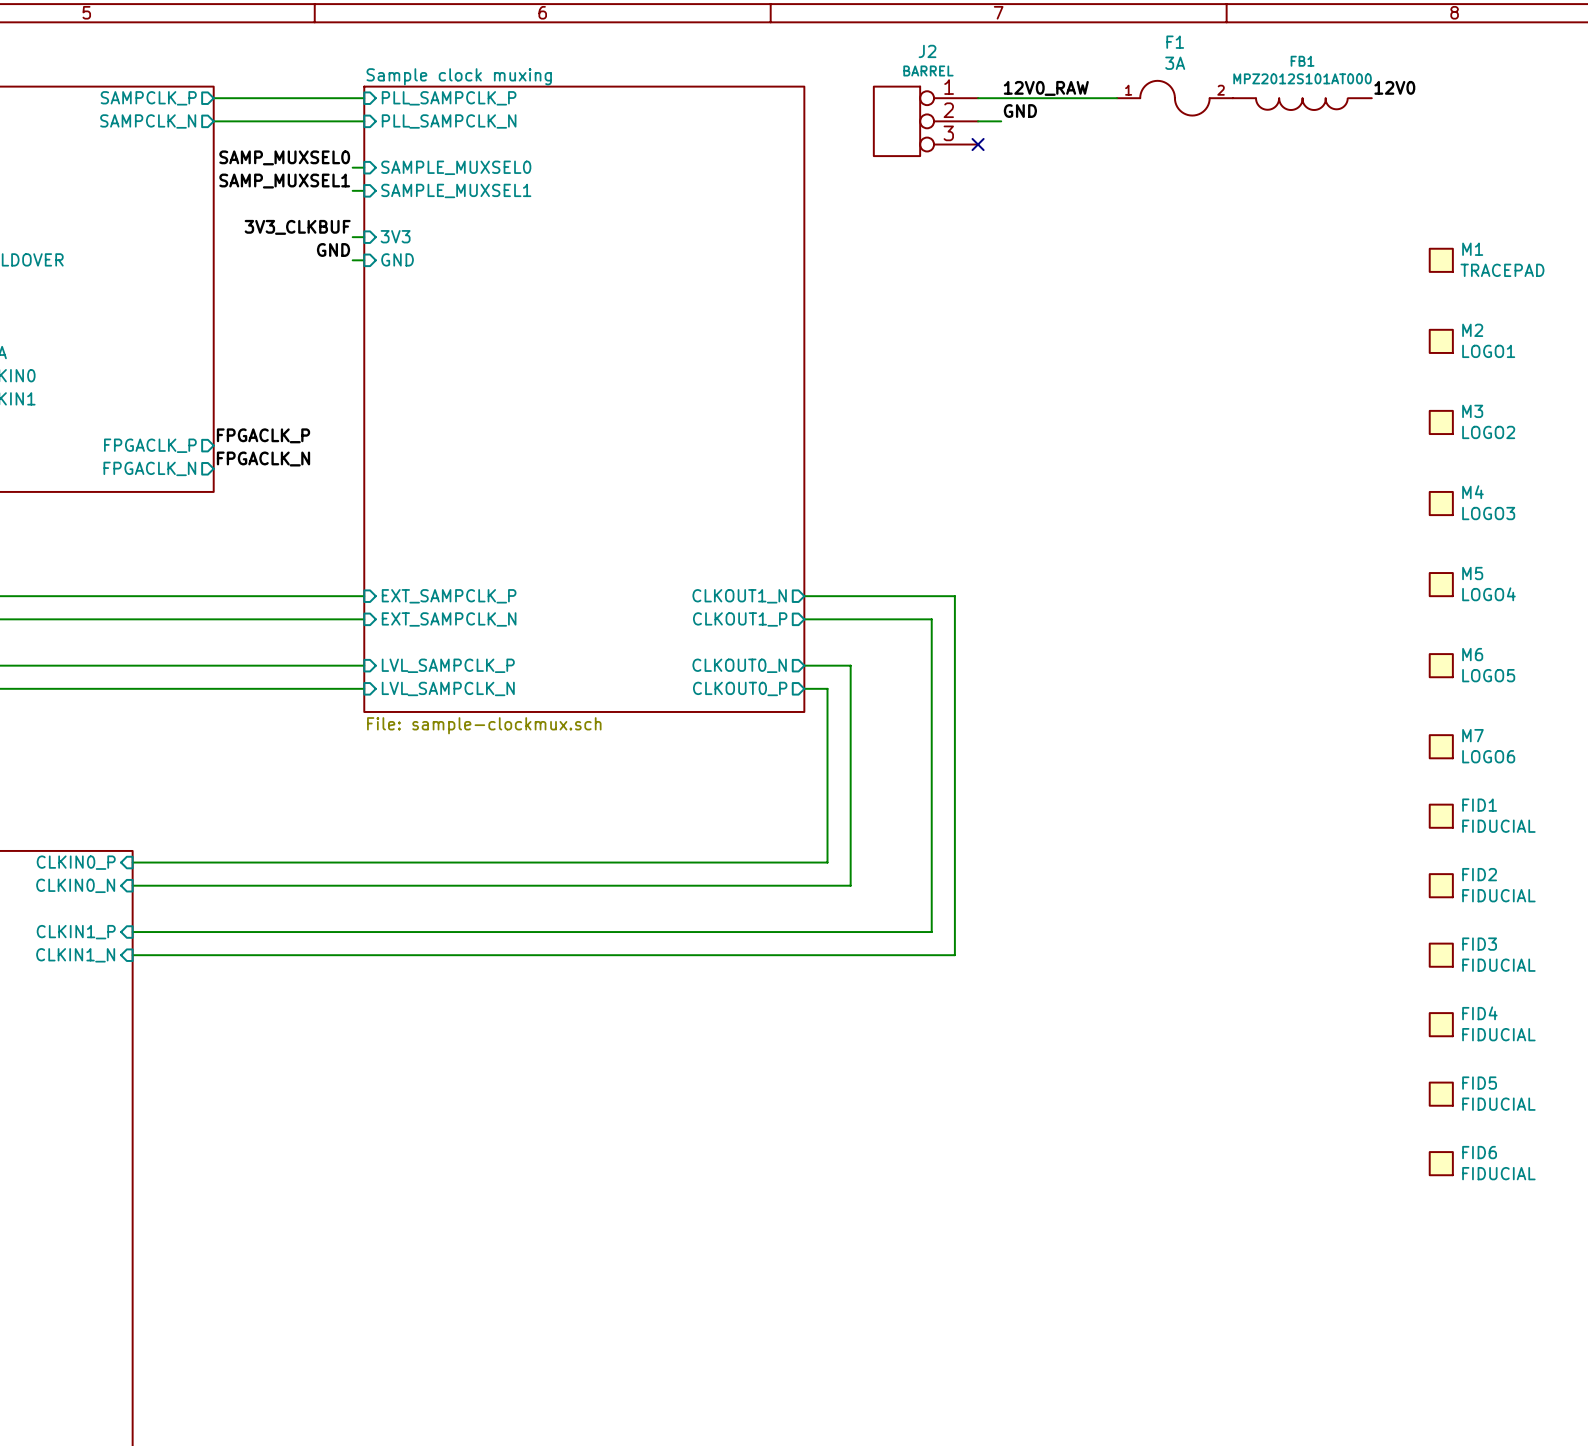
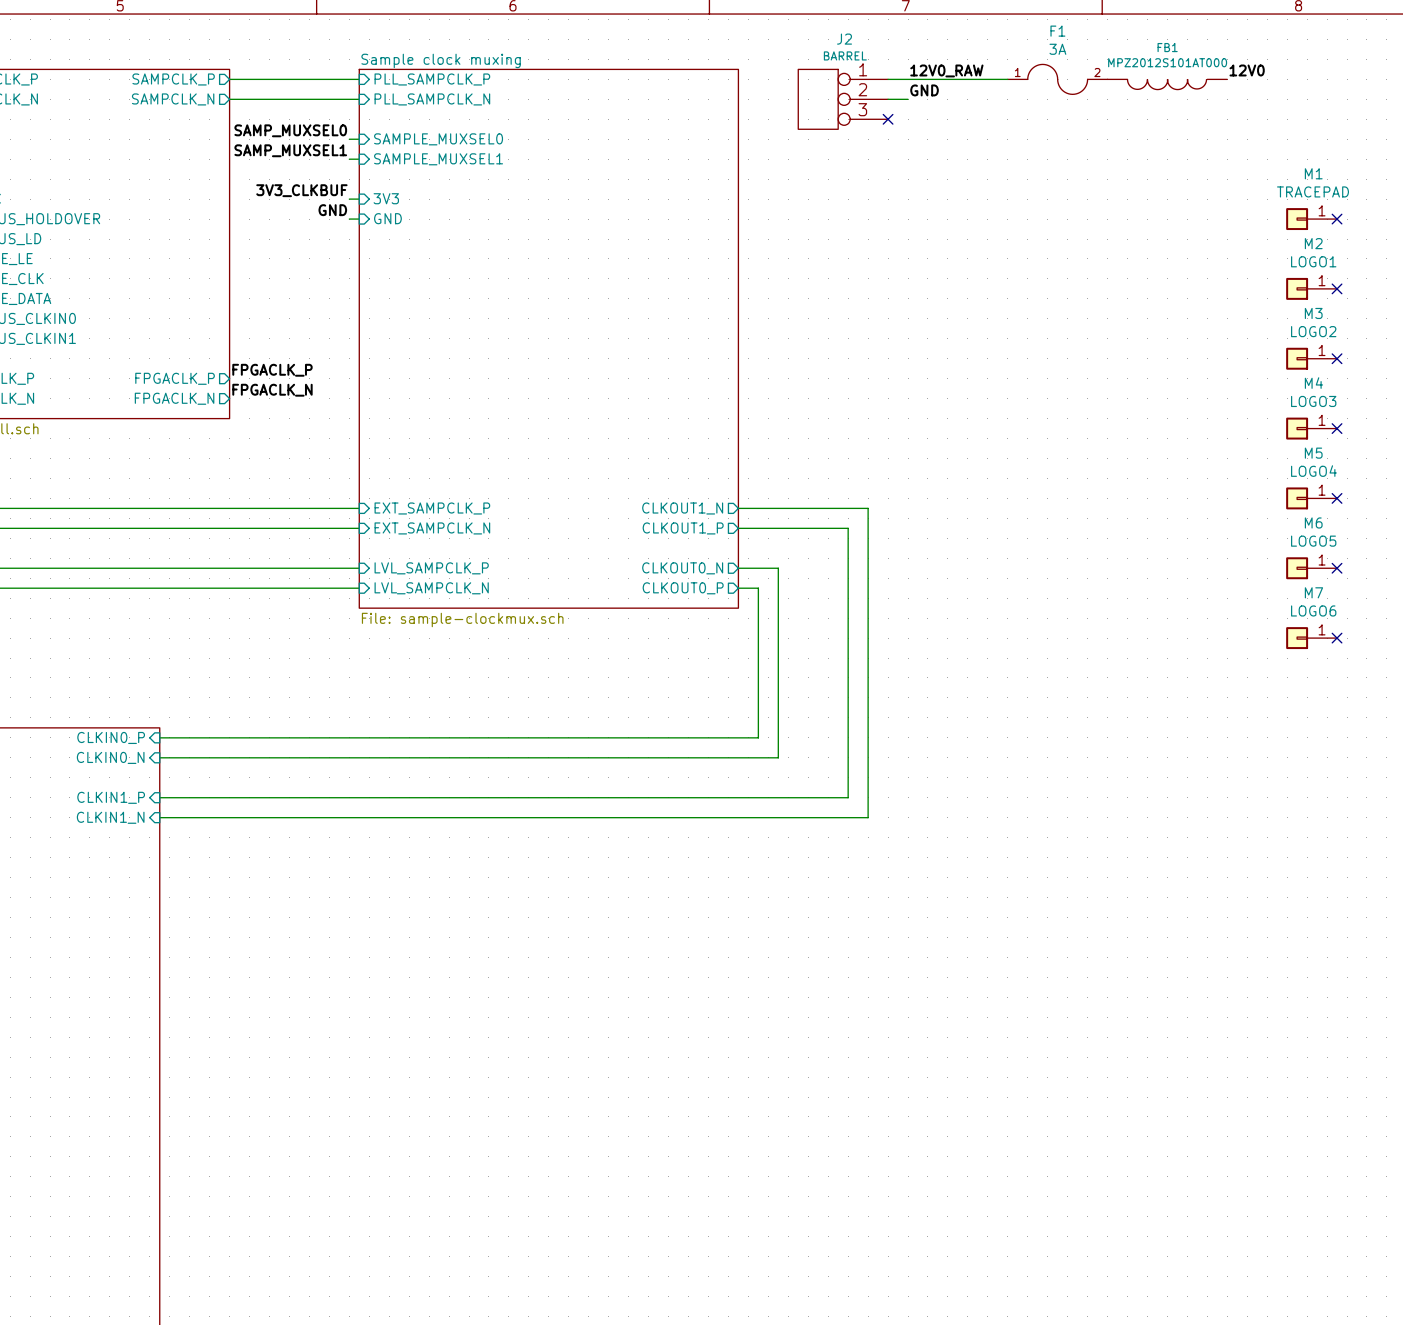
M1 symbol: [1429, 248, 1453, 272] -> [1286, 208, 1338, 231]
M1 name position: M1 (1472, 249) -> M1 (1313, 173)
no-connect mark: none -> (1337, 219)
M1 value position: TRACEPAD (1502, 270) -> TRACEPAD (1313, 191)
M2 symbol: [1429, 329, 1453, 353] -> [1286, 277, 1338, 300]
M2 name position: M2 (1472, 330) -> M2 (1313, 243)
no-connect mark: none -> (1337, 288)
M2 value position: LOGO1 (1488, 351) -> LOGO1 (1313, 261)
M3 symbol: [1429, 410, 1453, 435] -> [1286, 347, 1338, 370]
M3 name position: M3 (1472, 411) -> M3 (1313, 313)
no-connect mark: none -> (1337, 358)
M3 value position: LOGO2 (1488, 432) -> LOGO2 (1313, 331)
M4 symbol: [1429, 491, 1453, 516] -> [1286, 417, 1338, 440]
M4 name position: M4 (1472, 492) -> M4 (1313, 383)
no-connect mark: none -> (1337, 428)
M4 value position: LOGO3 (1488, 513) -> LOGO3 (1313, 401)
M5 symbol: [1429, 573, 1453, 597] -> [1286, 487, 1338, 510]
M5 name position: M5 (1472, 573) -> M5 (1313, 453)
no-connect mark: none -> (1337, 498)
M5 value position: LOGO4 (1488, 594) -> LOGO4 (1313, 471)
M6 symbol: [1429, 654, 1453, 678] -> [1286, 557, 1338, 580]
M6 name position: M6 (1472, 654) -> M6 (1313, 522)
no-connect mark: none -> (1337, 568)
M6 value position: LOGO5 (1488, 675) -> LOGO5 (1313, 541)
M7 symbol: [1429, 735, 1453, 759] -> [1286, 627, 1338, 650]
M7 name position: M7 (1472, 735) -> M7 (1313, 592)
no-connect mark: none -> (1337, 638)
M7 value position: LOGO6 (1488, 756) -> LOGO6 (1313, 610)
FID1: FIDUCIAL (1441, 816) -> none
FID2: FIDUCIAL (1441, 885) -> none
FID3: FIDUCIAL (1441, 955) -> none
FID4: FIDUCIAL (1441, 1024) -> none
FID5: FIDUCIAL (1441, 1094) -> none
FID6: FIDUCIAL (1441, 1163) -> none

